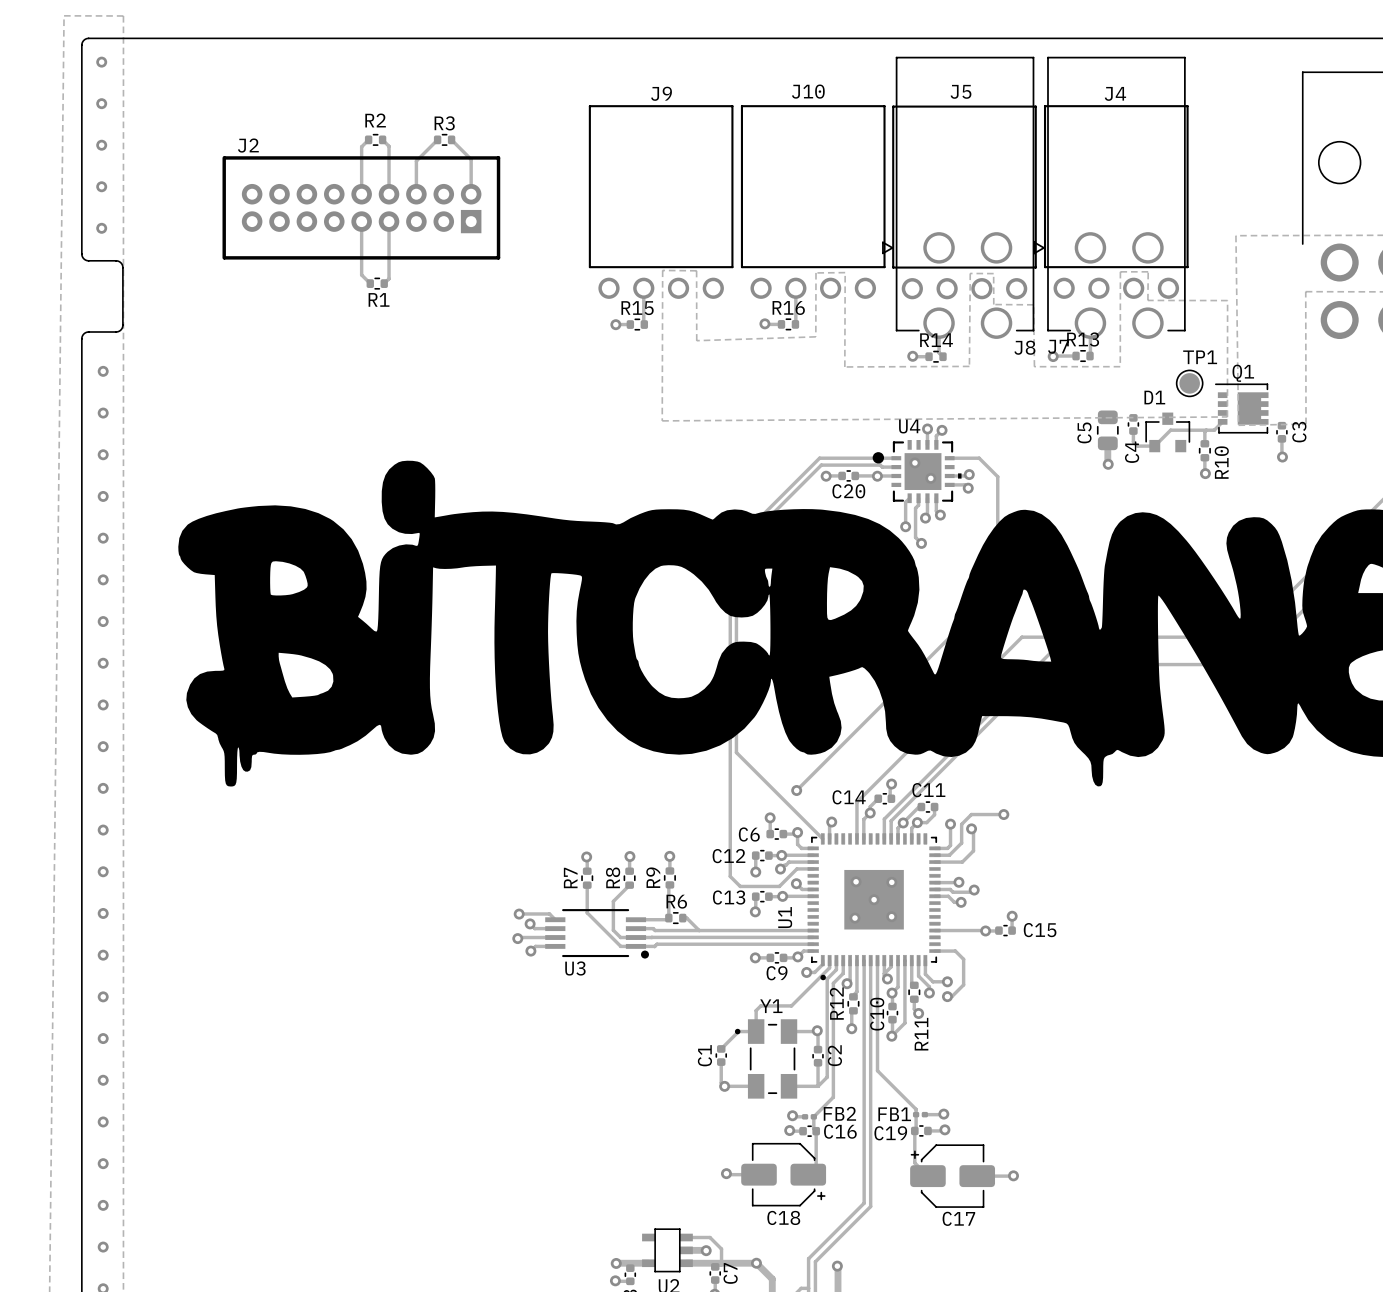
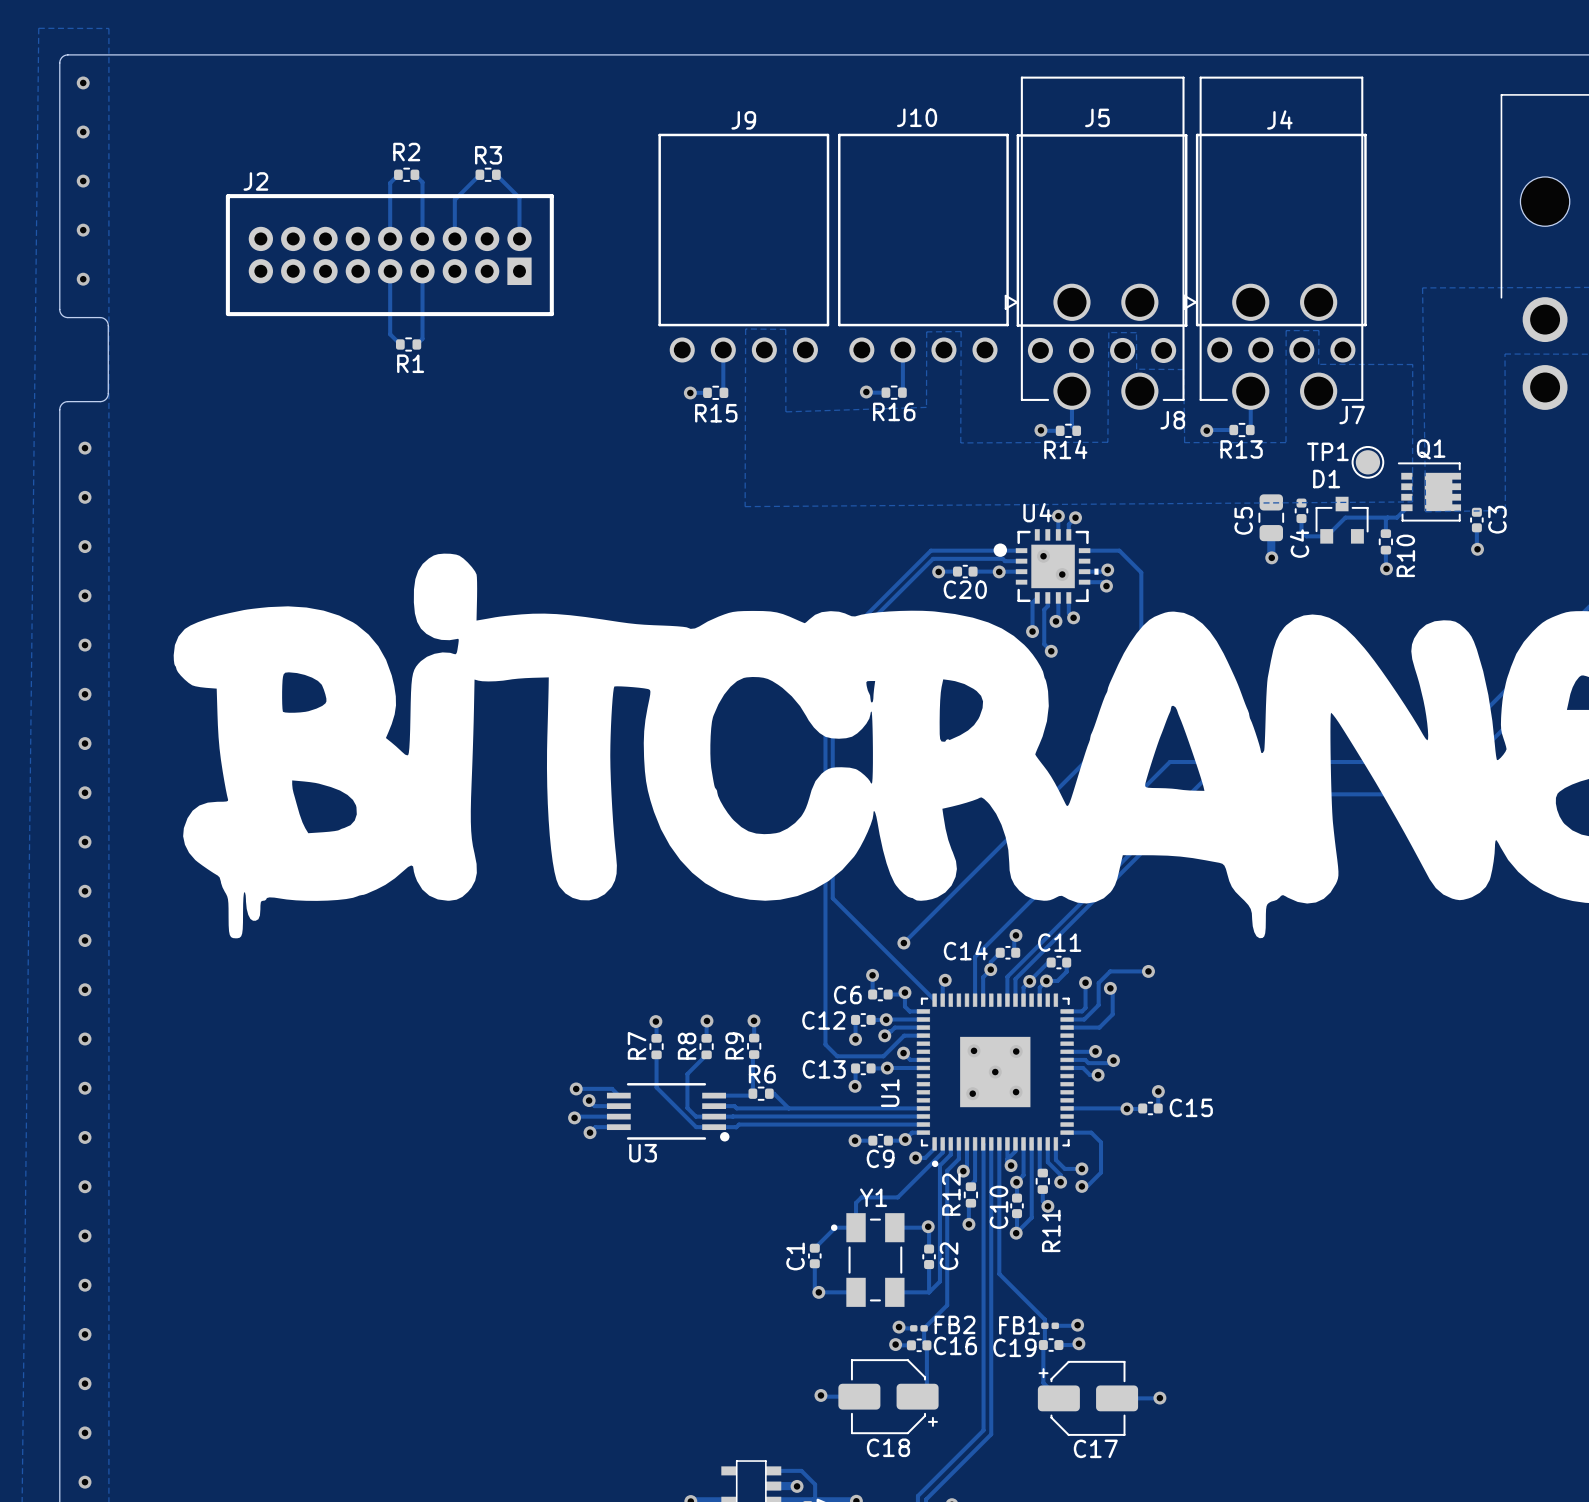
R16 name position: R16 (788, 307) -> R16 (894, 411)
R15 name position: R15 (637, 308) -> R15 (716, 413)
R13 name position: R13 (1083, 339) -> R13 (1241, 449)
R14 name position: R14 (936, 340) -> R14 (1065, 449)
J7 name position: J7 (1058, 346) -> J7 (1352, 415)
TP1 name position: TP1 (1200, 357) -> TP1 (1327, 451)

